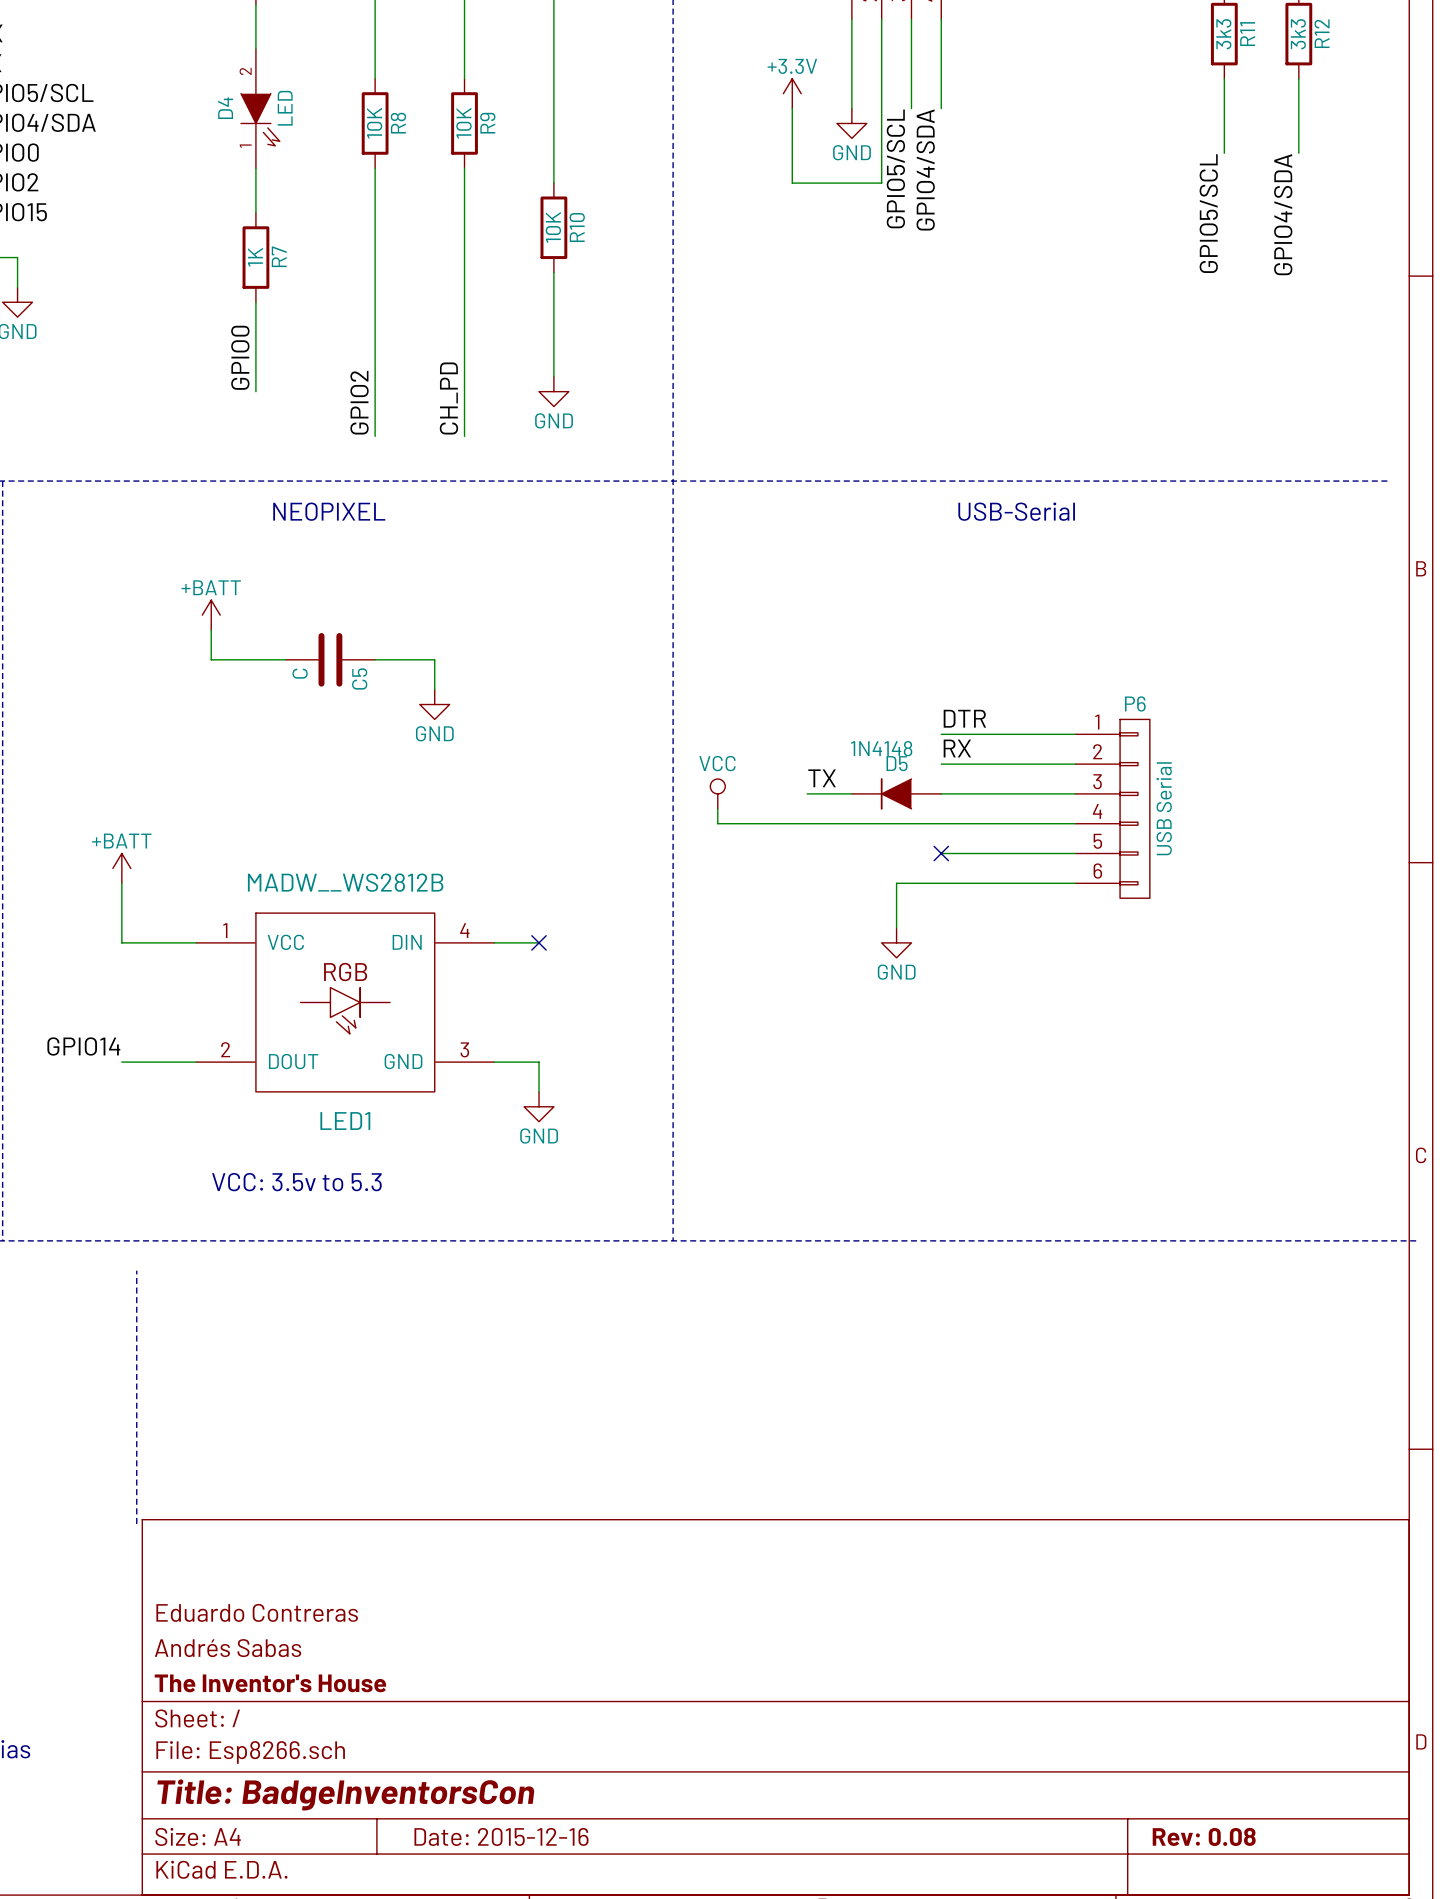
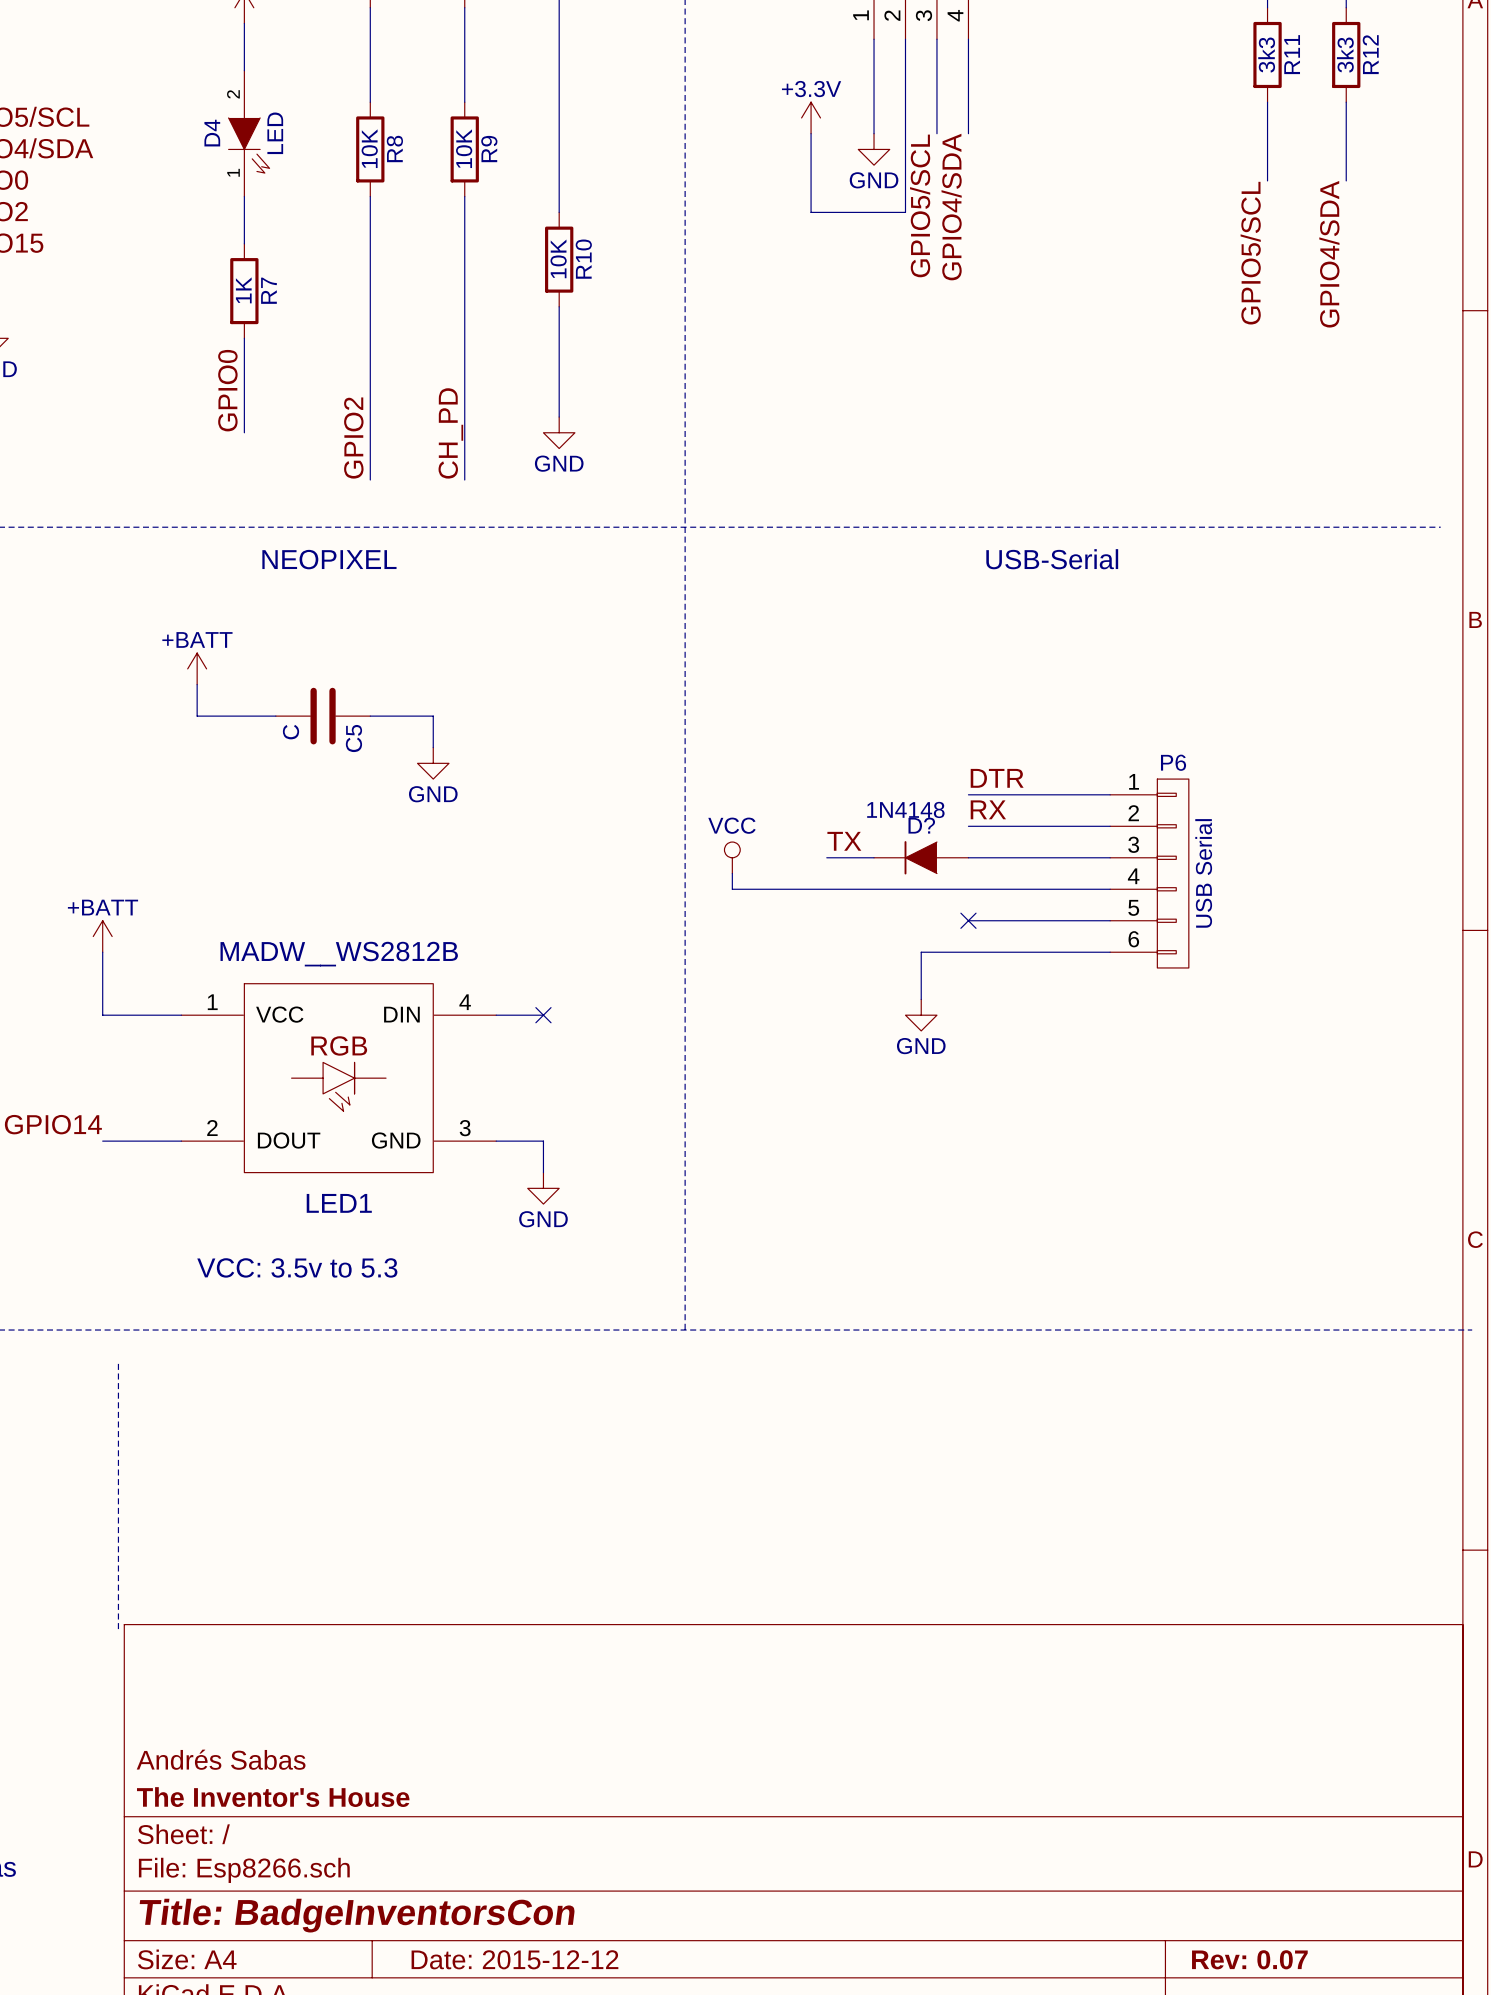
D5 name: D5 (897, 763) -> D? (921, 825)
title block: Eduardo Contreras (257, 1612) -> none
title block: Date: 2015-12-16 (501, 1836) -> Date: 2015-12-12 (514, 1959)
title block: Rev: 0.08 (1204, 1836) -> Rev: 0.07 (1249, 1959)

